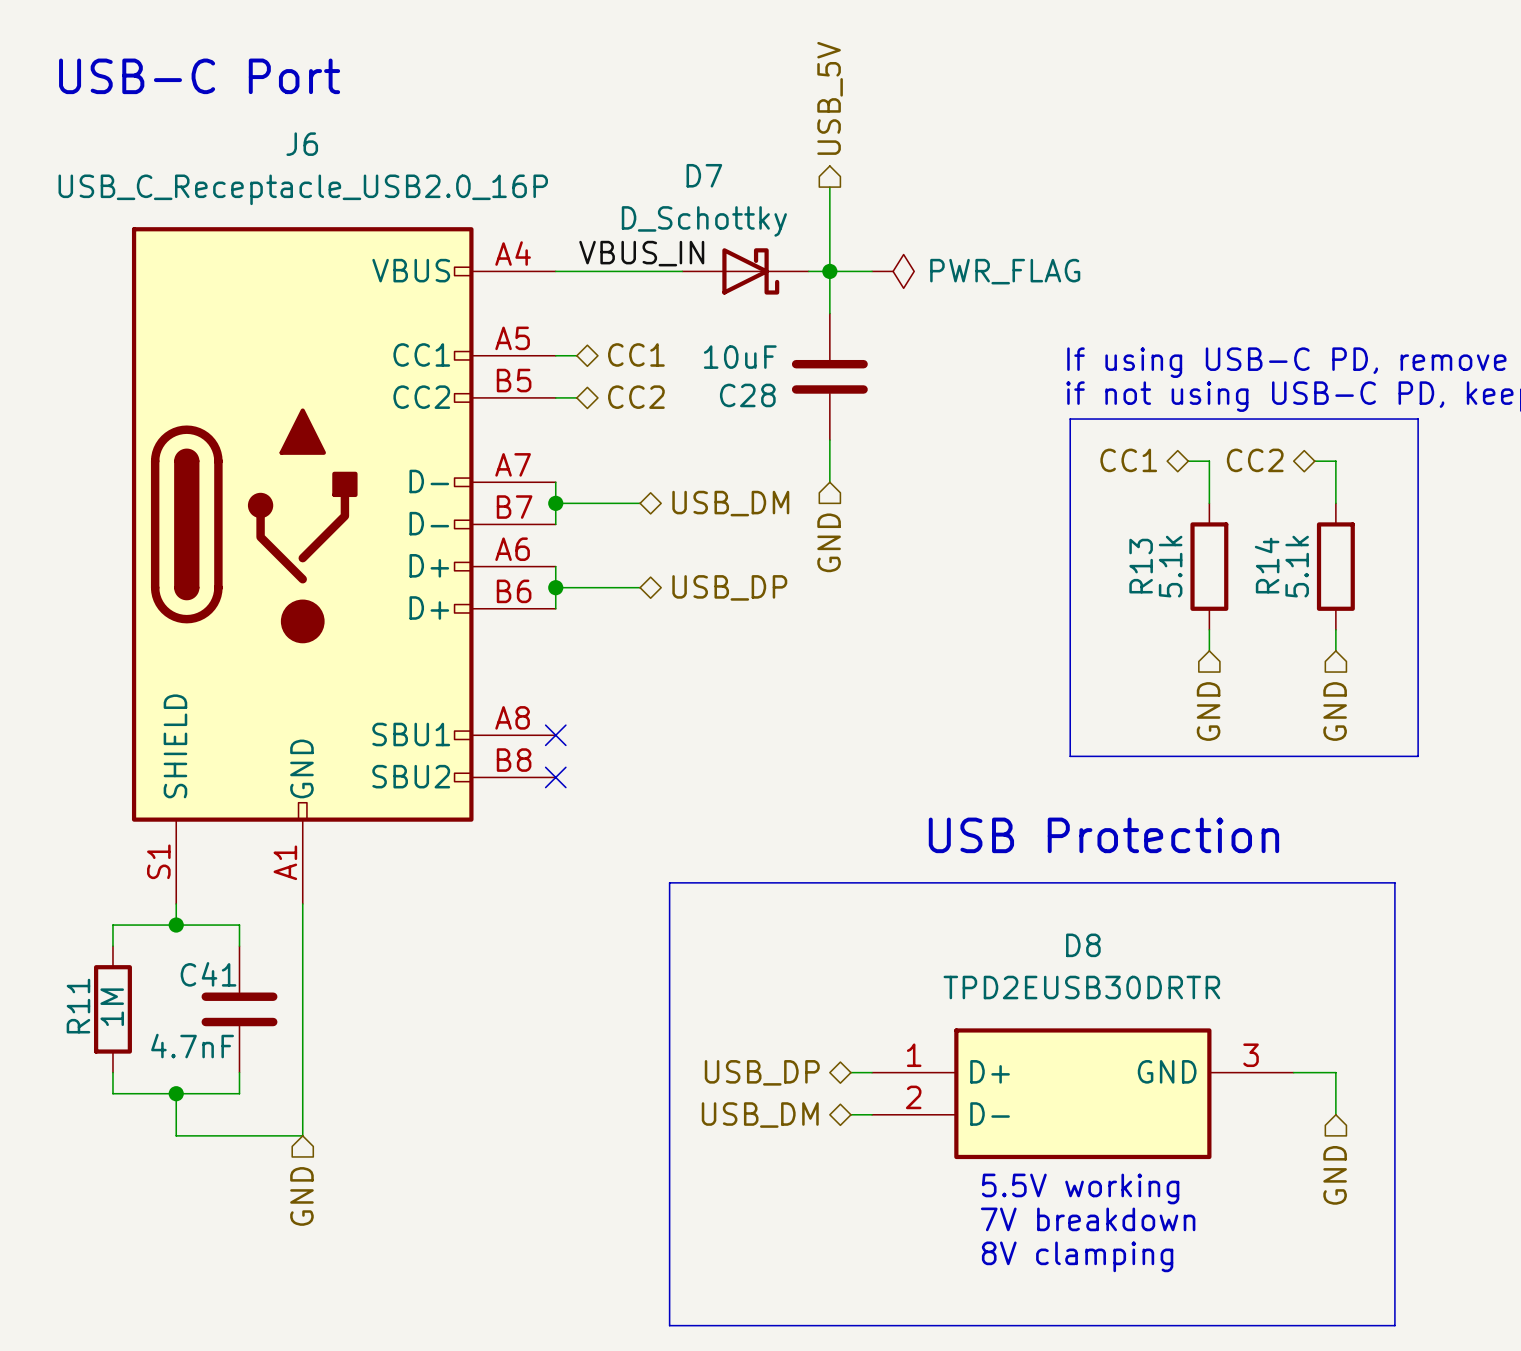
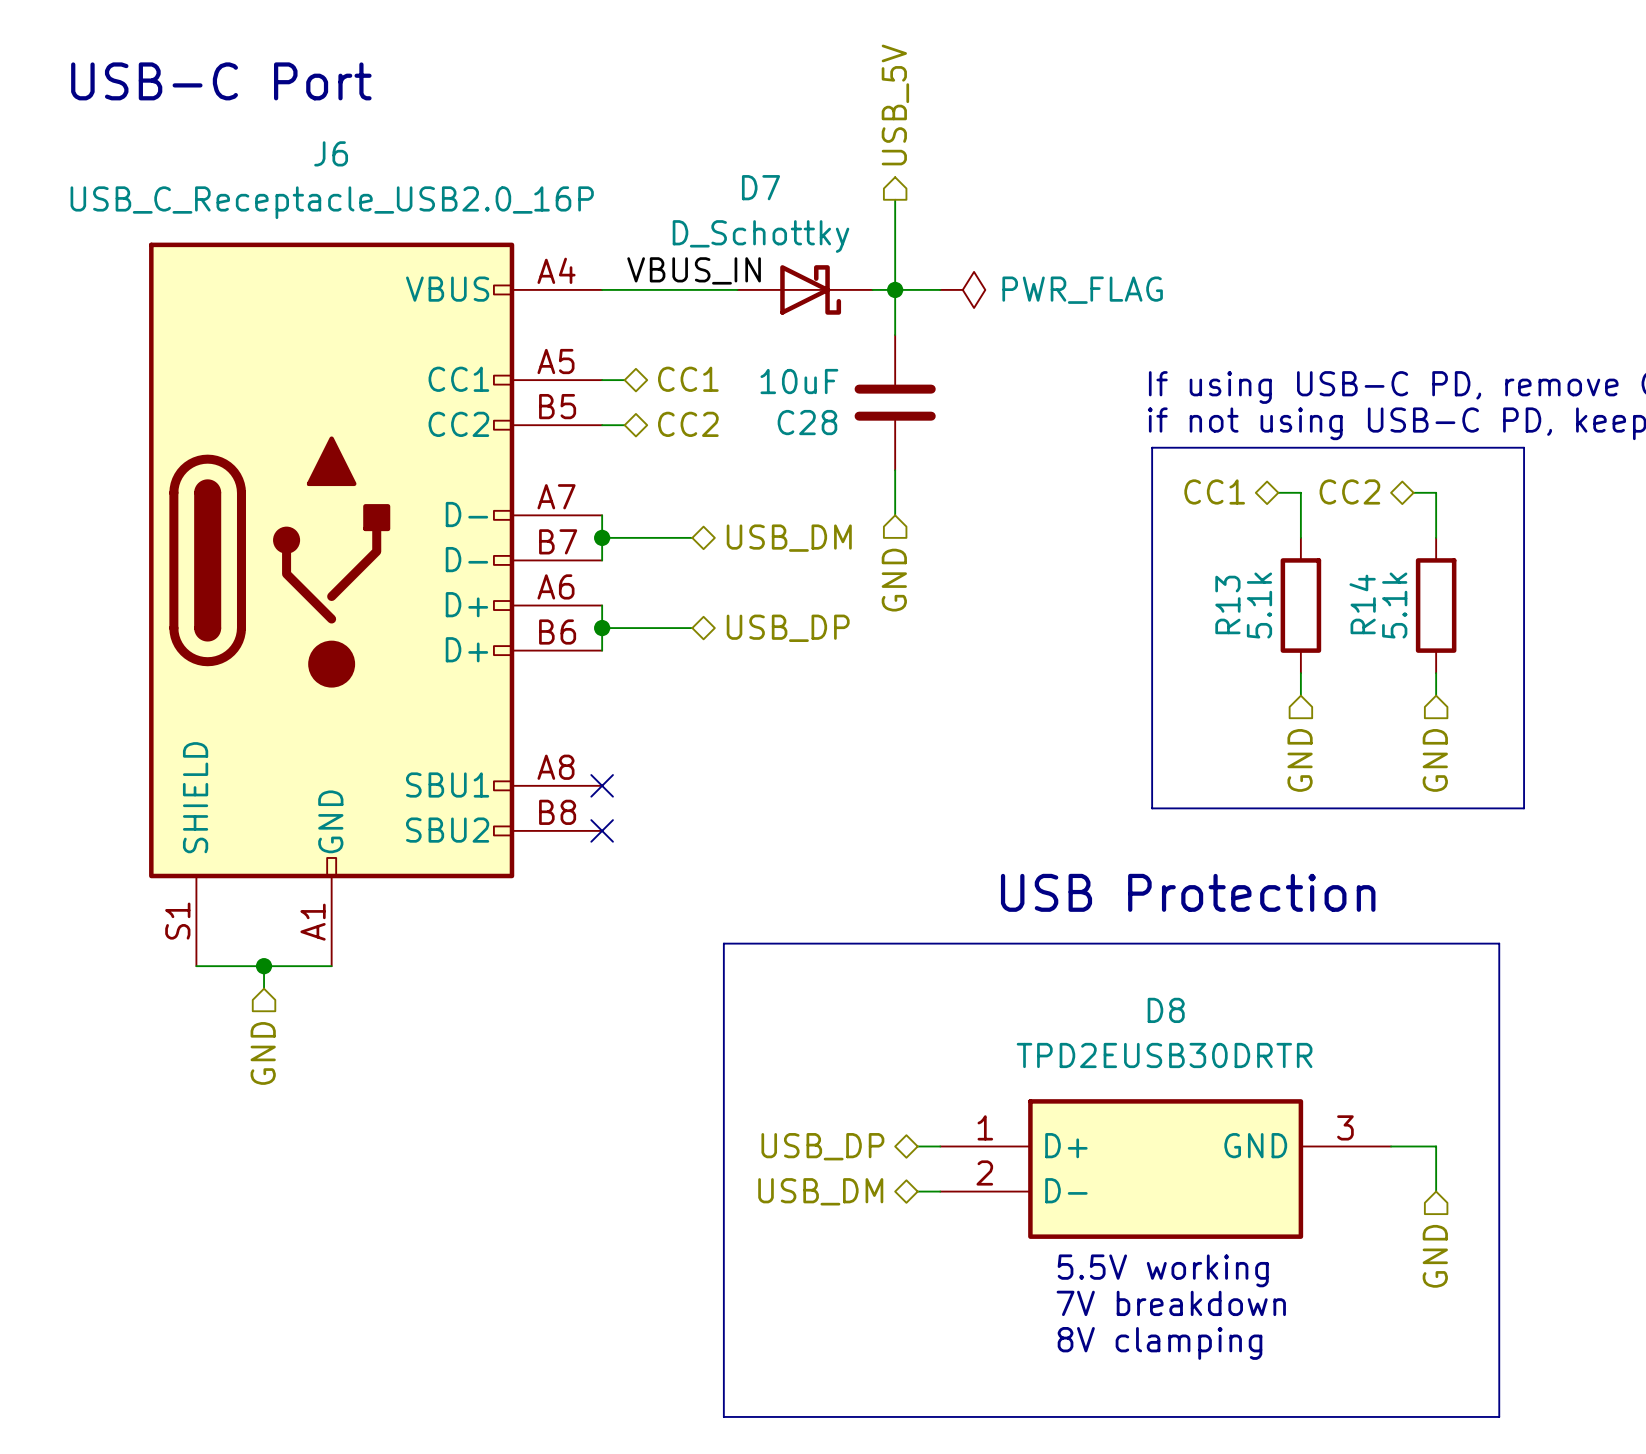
wire: (176, 903) (176, 925) -> (196, 966) (331, 966)
wire: none -> (264, 966) (264, 988)
wire: (302, 903) (302, 1135) (176, 1135) (176, 1093) -> none
junction position: (176, 925) -> (264, 966)
wire: (112, 946) (112, 925) (239, 925) (239, 946) -> none
R11: 1M (112, 1009) -> none
C41: 4.7nF (239, 1009) -> none
wire: (112, 1072) (112, 1093) (239, 1093) (239, 1072) -> none
junction: (176, 1093) -> none
hierarchical label position: GND (301, 1196) -> GND (263, 1053)

